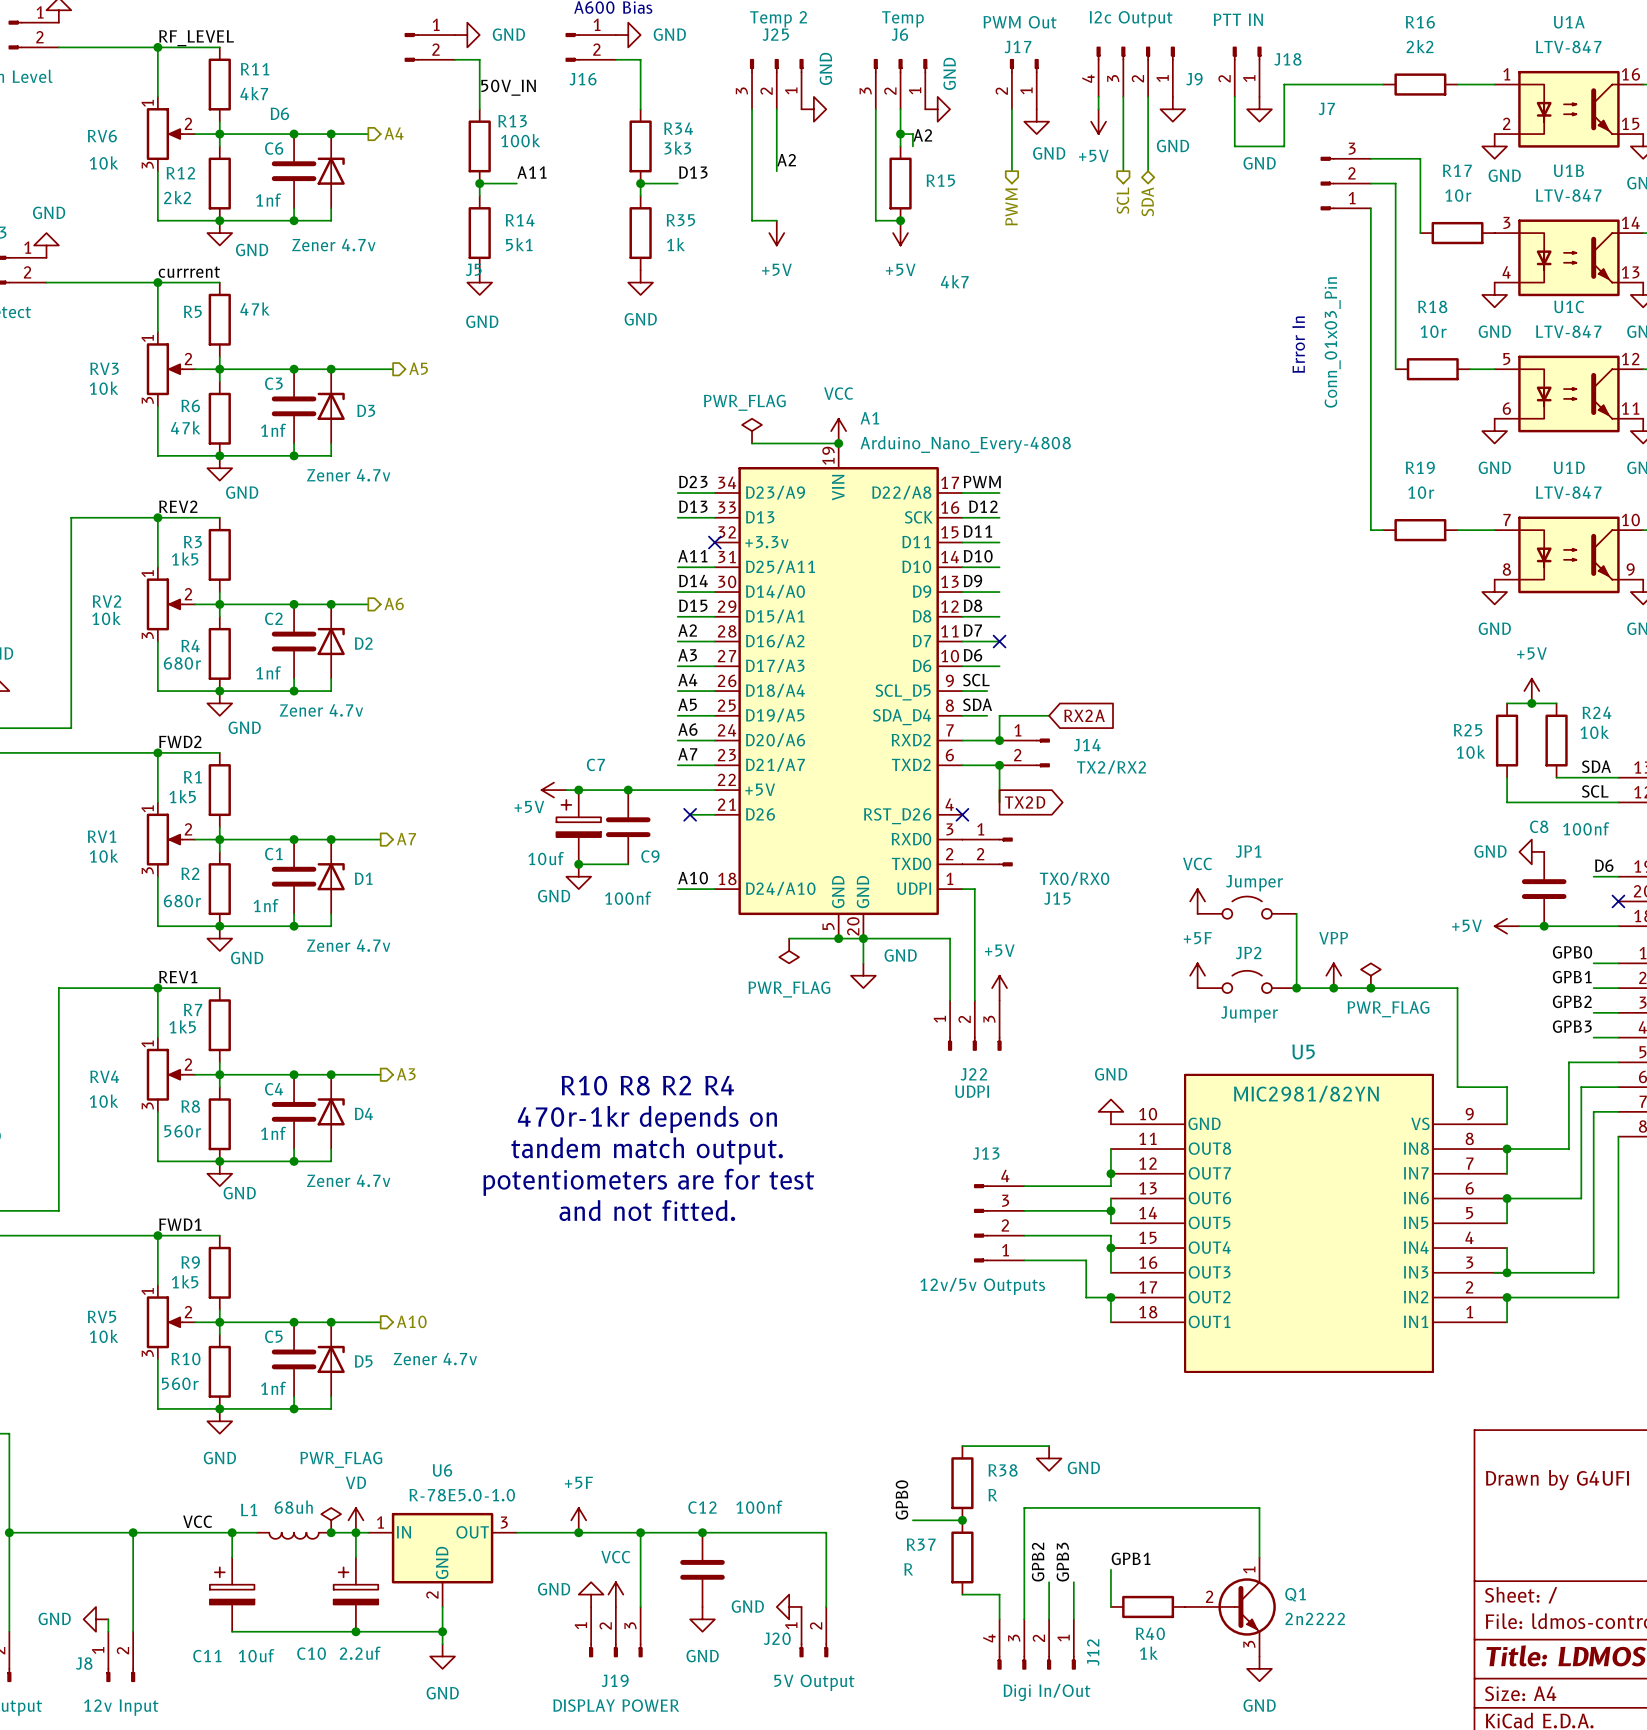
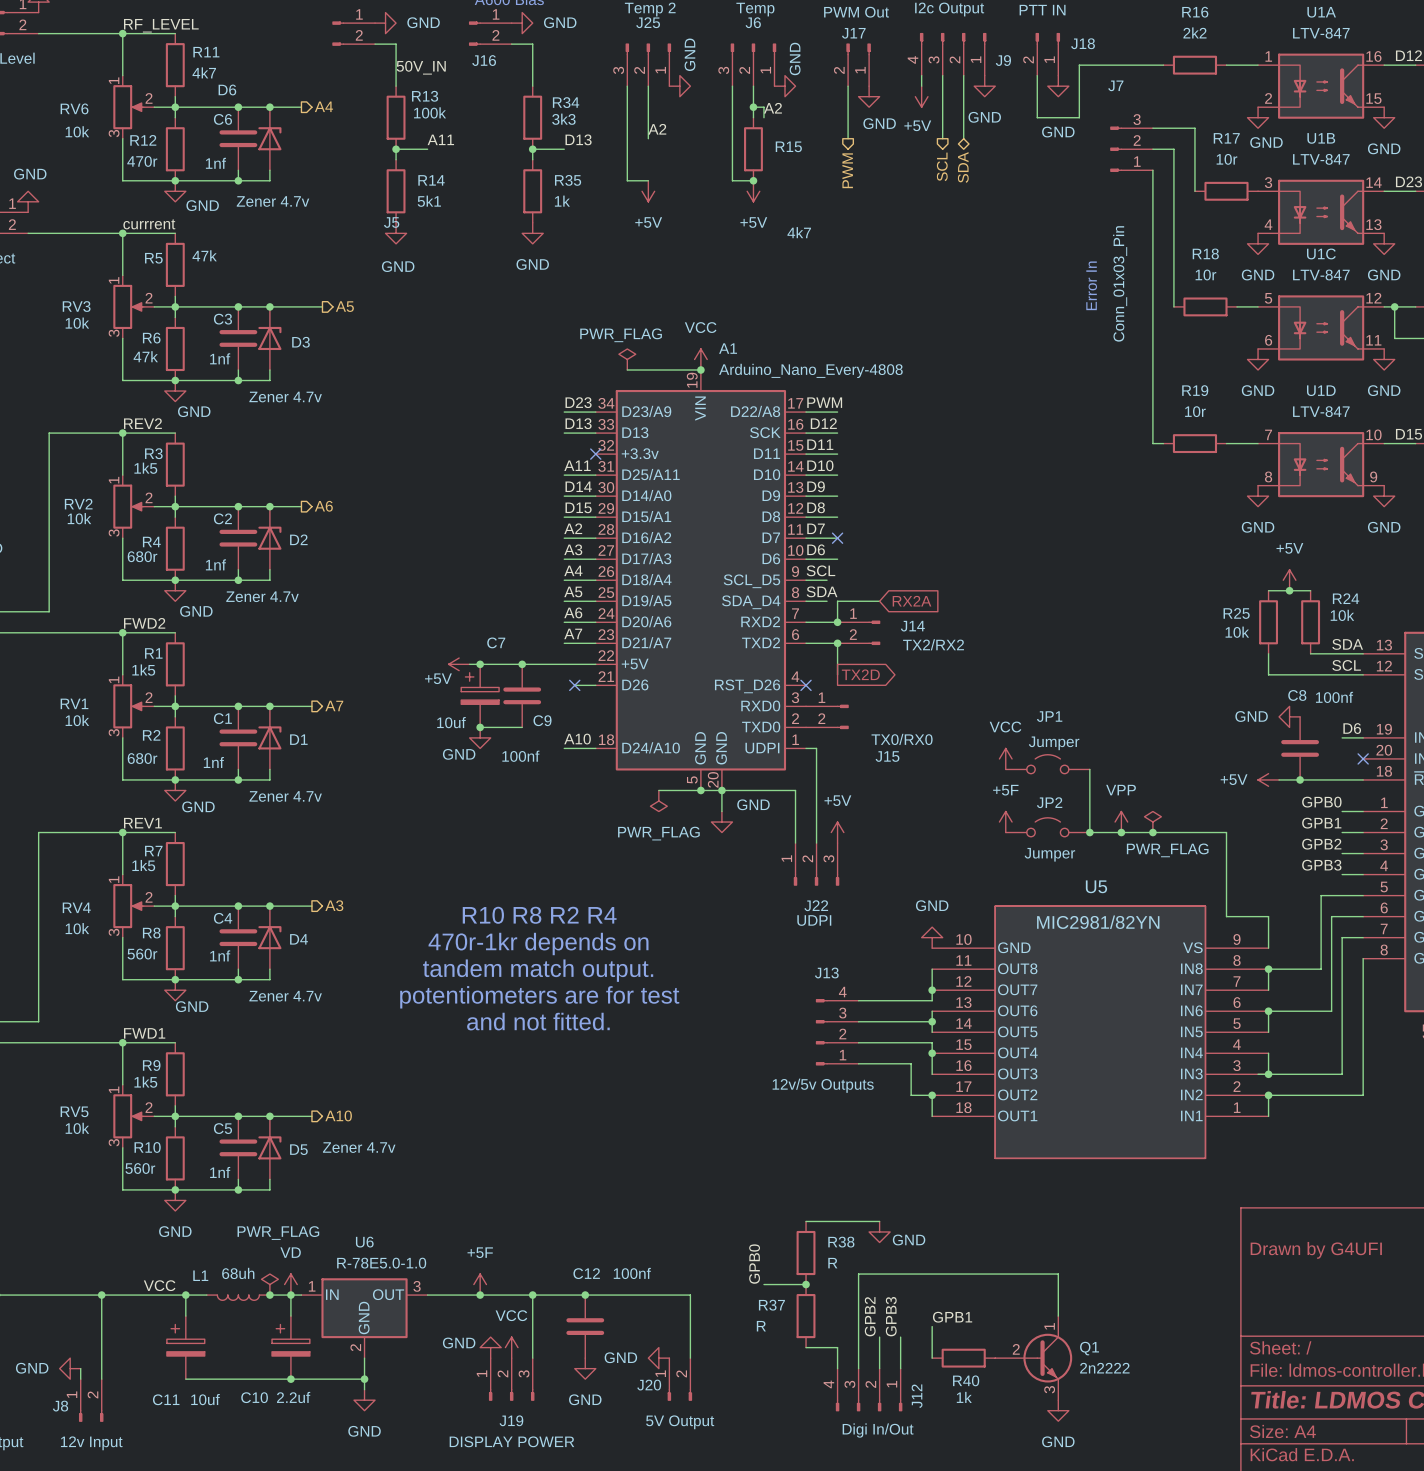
R12 value: 2k2 (177, 197) -> 470r (142, 161)

